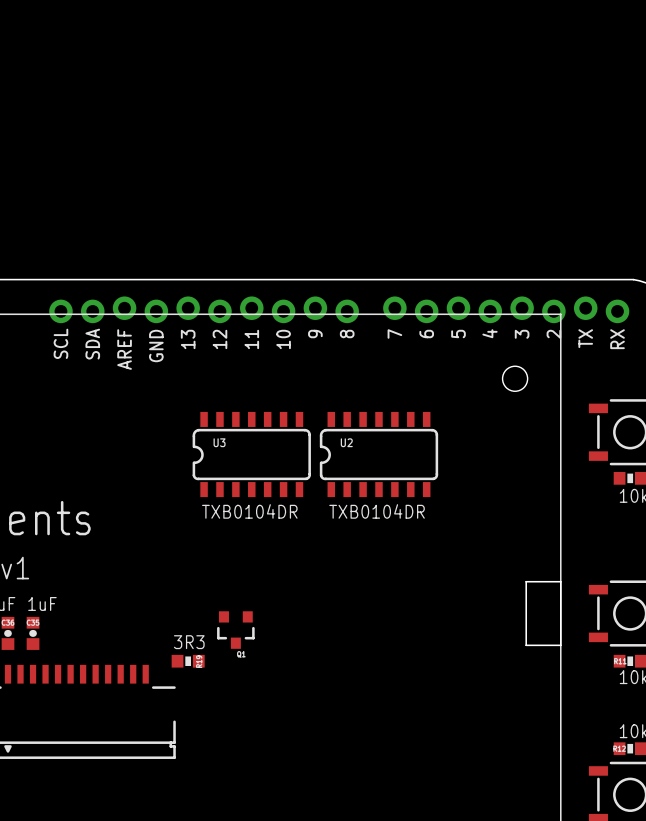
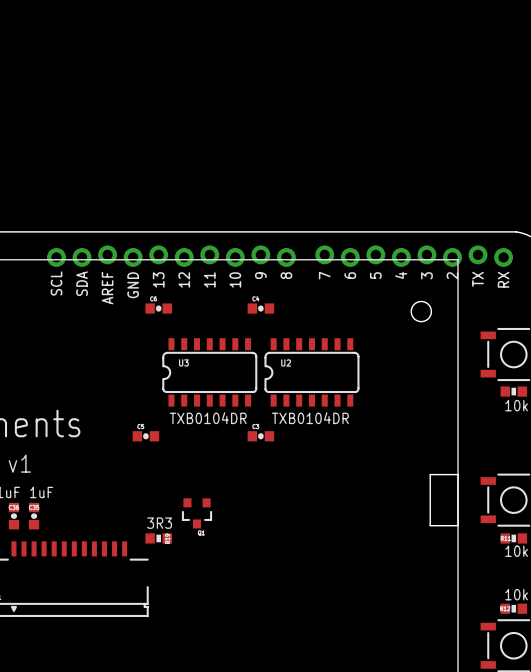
part: none -> (158, 308)
part: none -> (260, 308)
part: none -> (145, 436)
part: none -> (260, 436)

